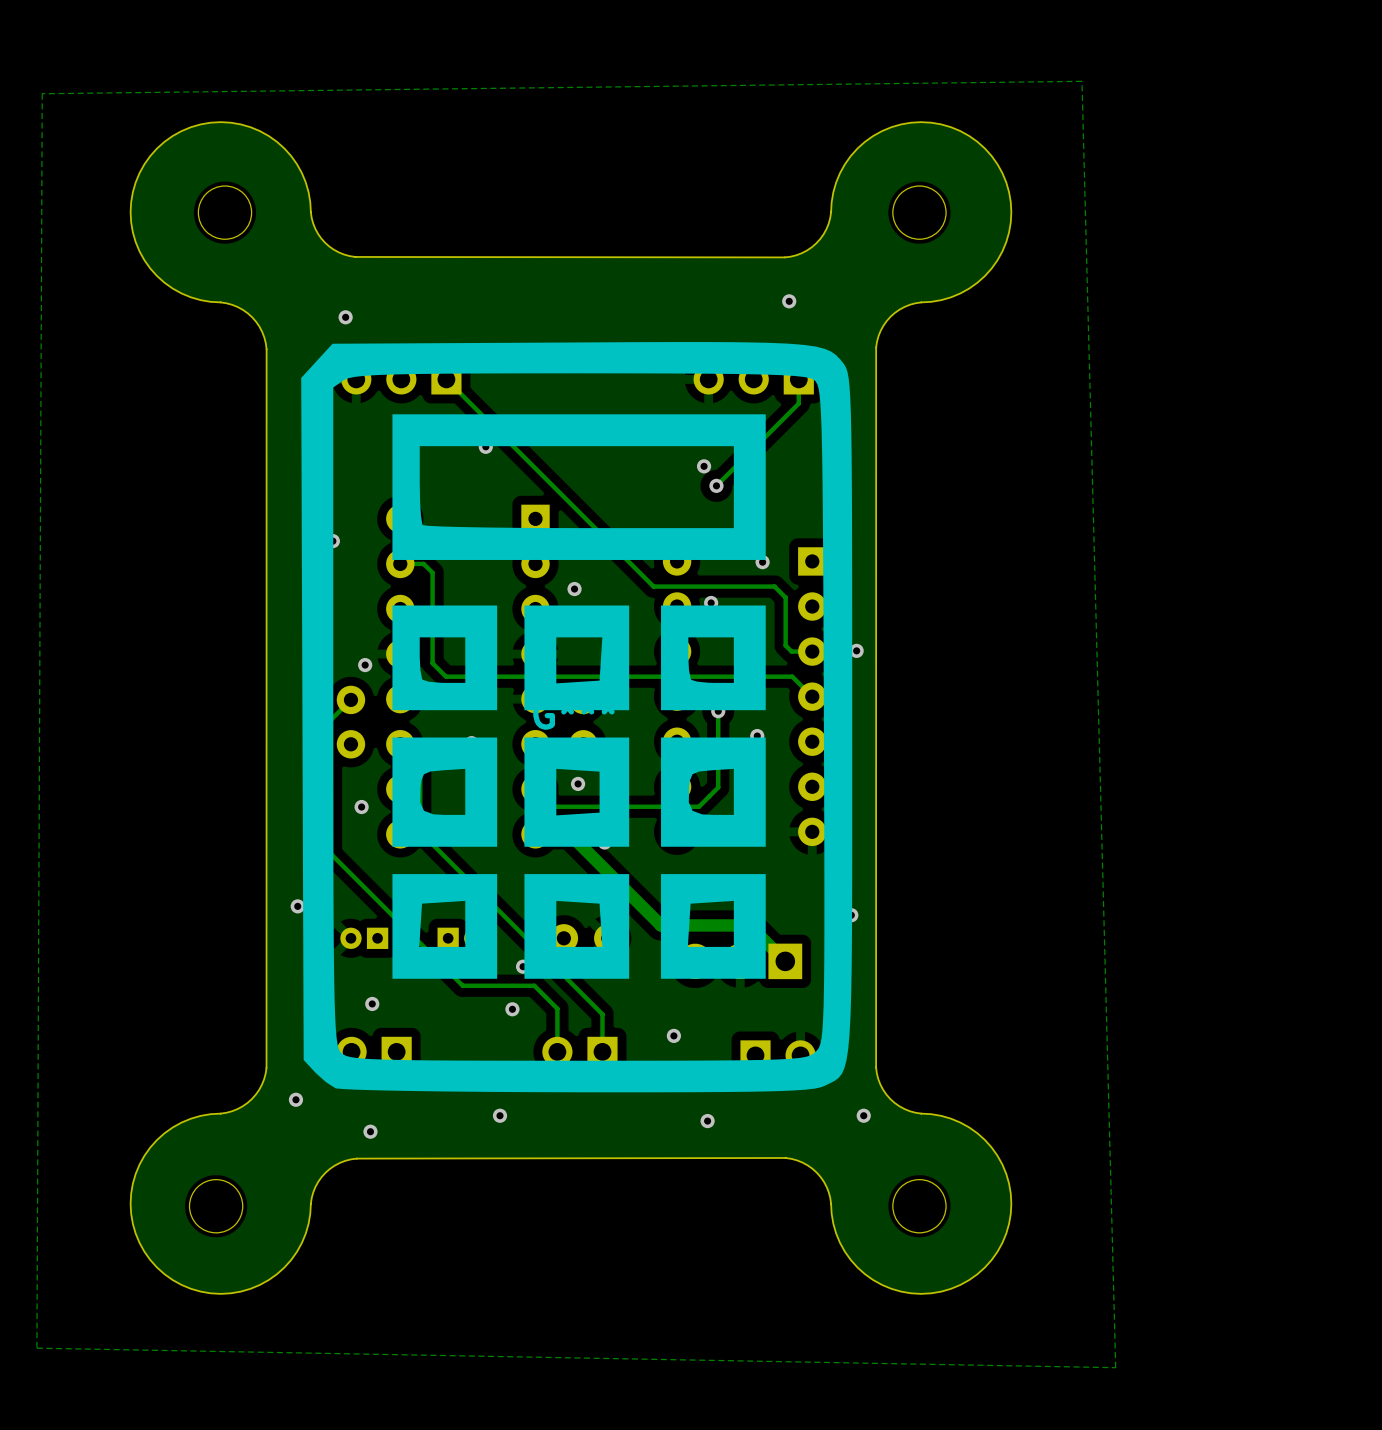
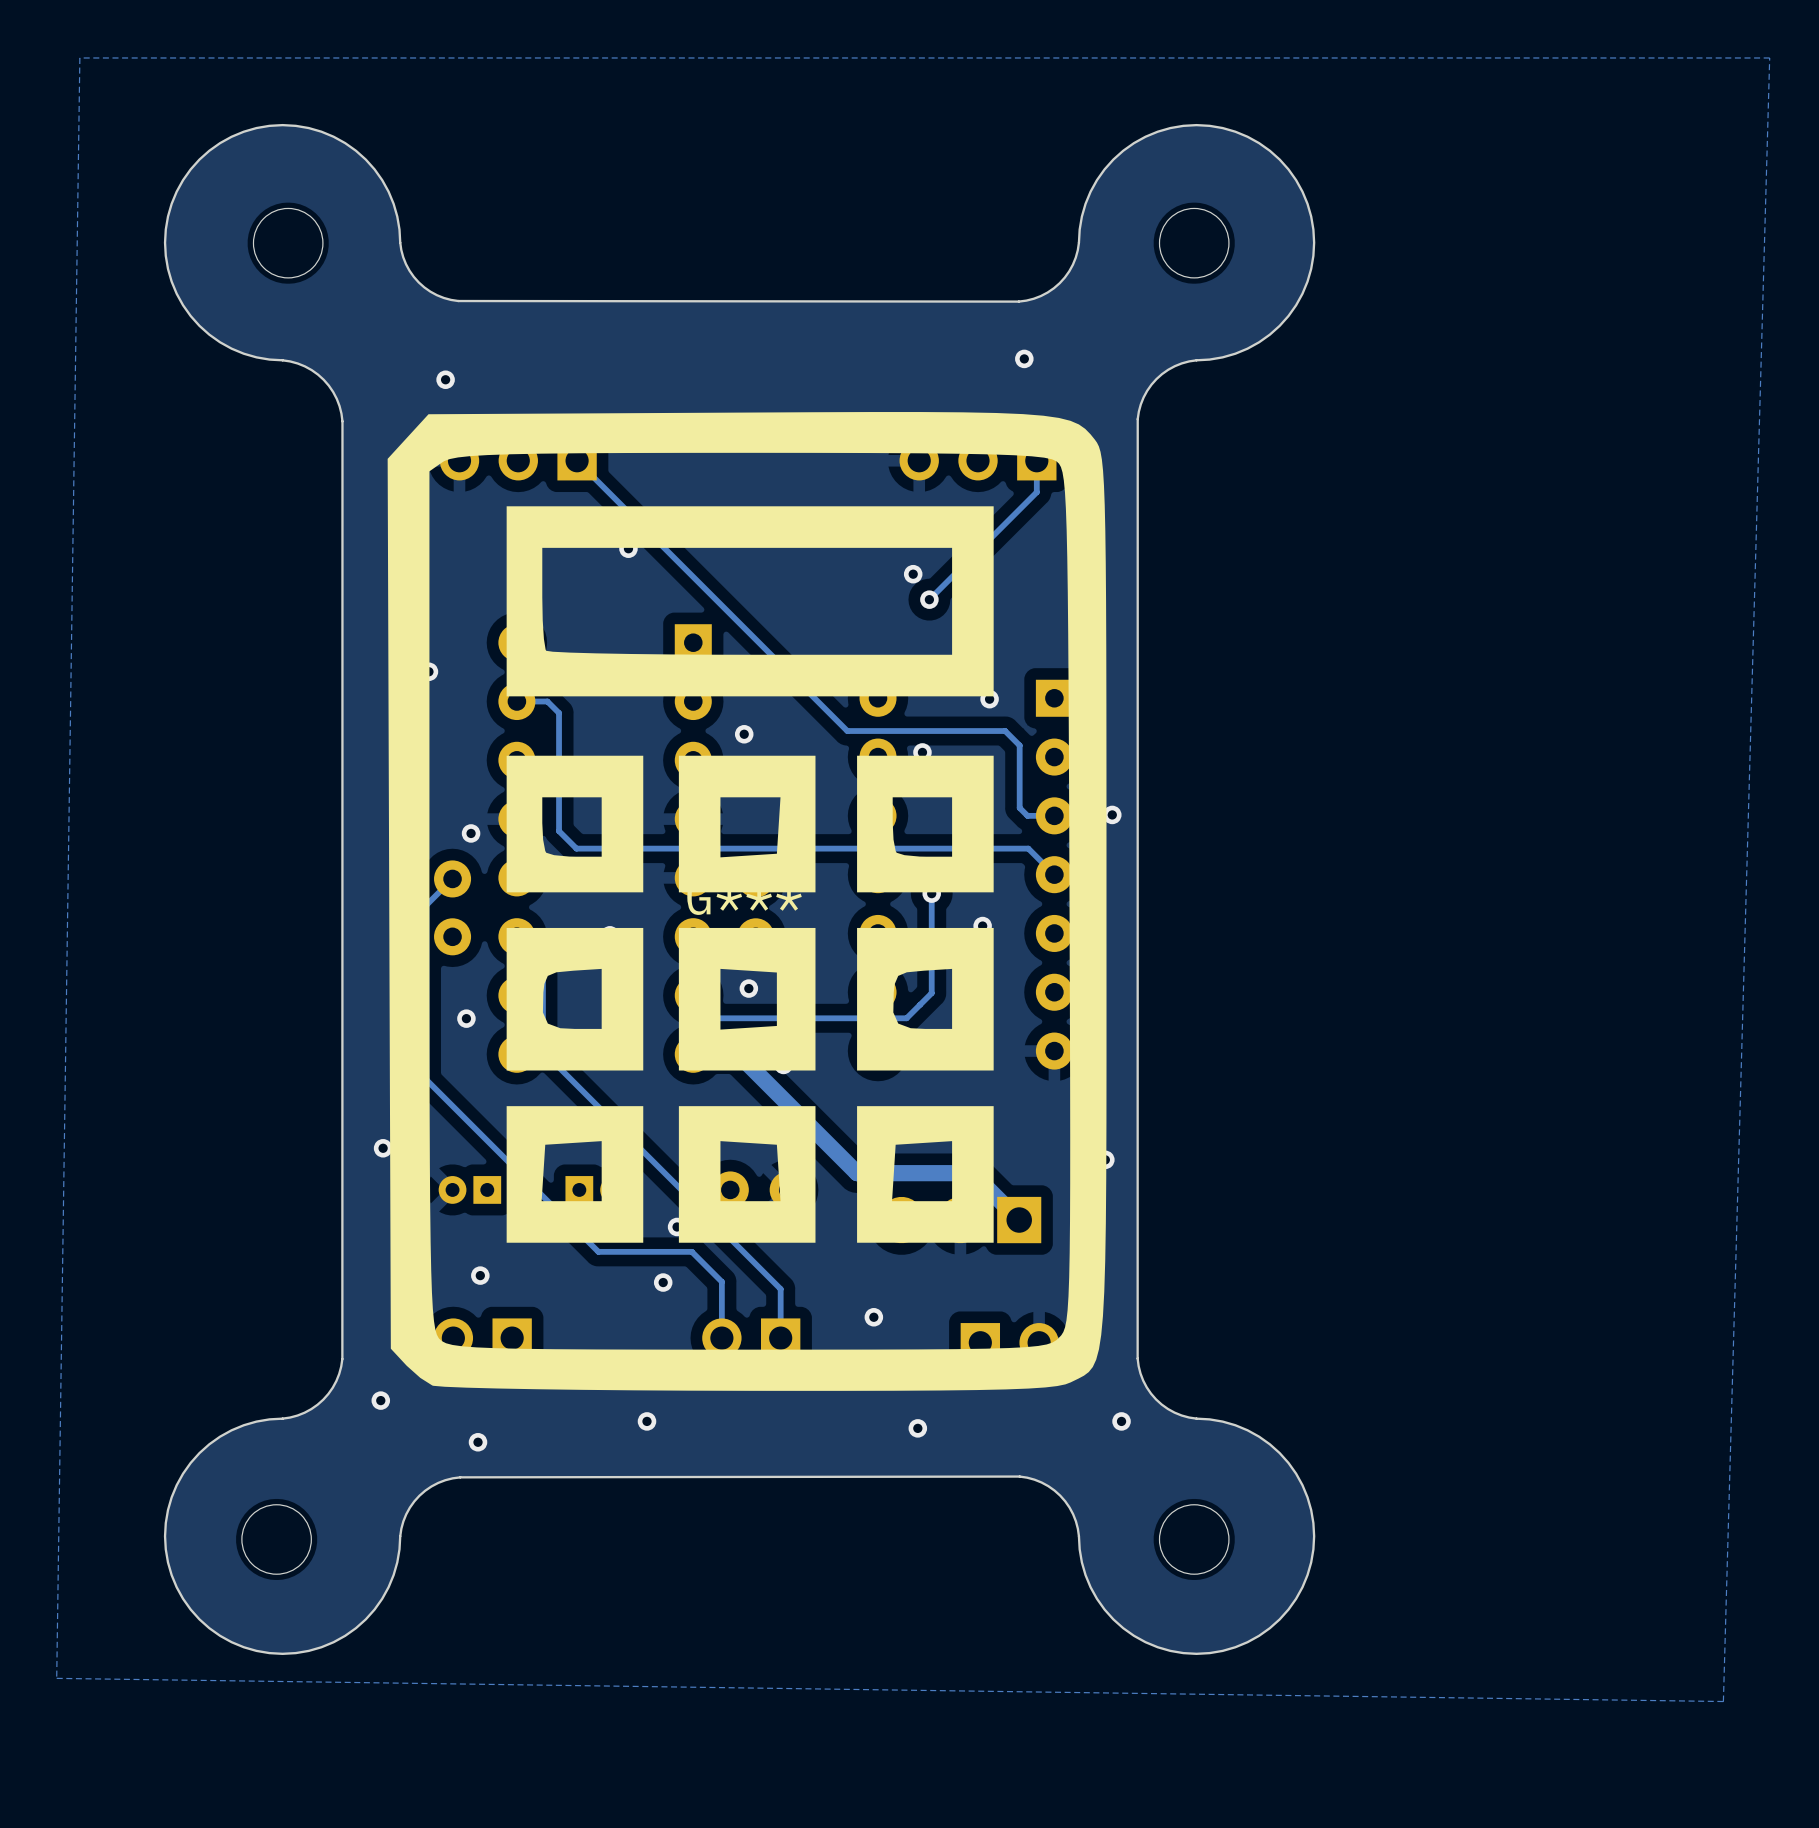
zone outline: (1081, 81) (42, 93) (36, 1348) (1115, 1367) (1081, 81) -> (1769, 57) (1723, 1701) (56, 1678) (79, 57) (1769, 57)

